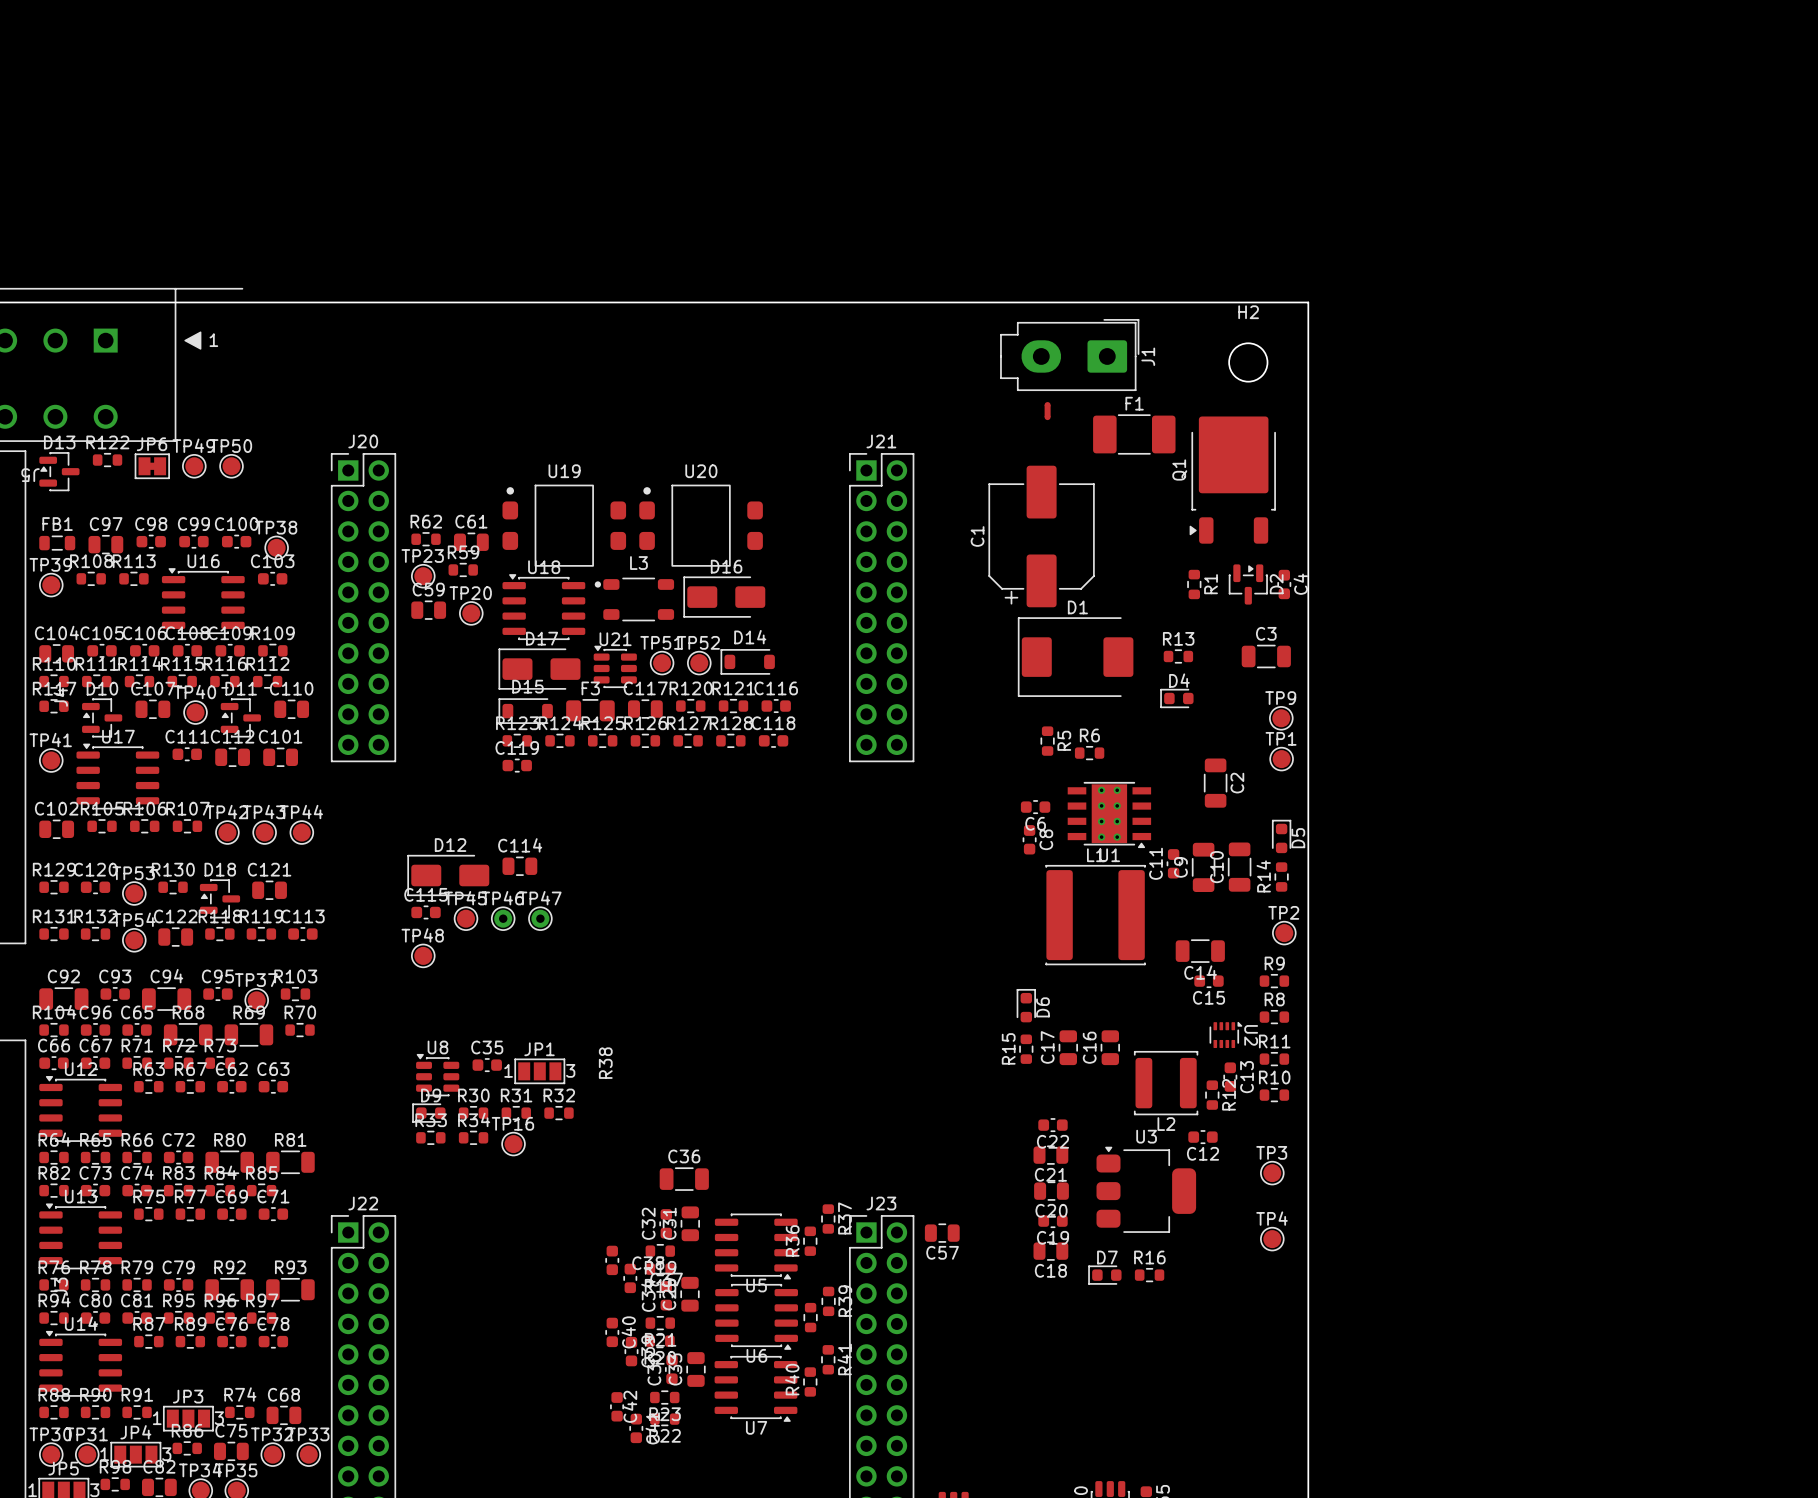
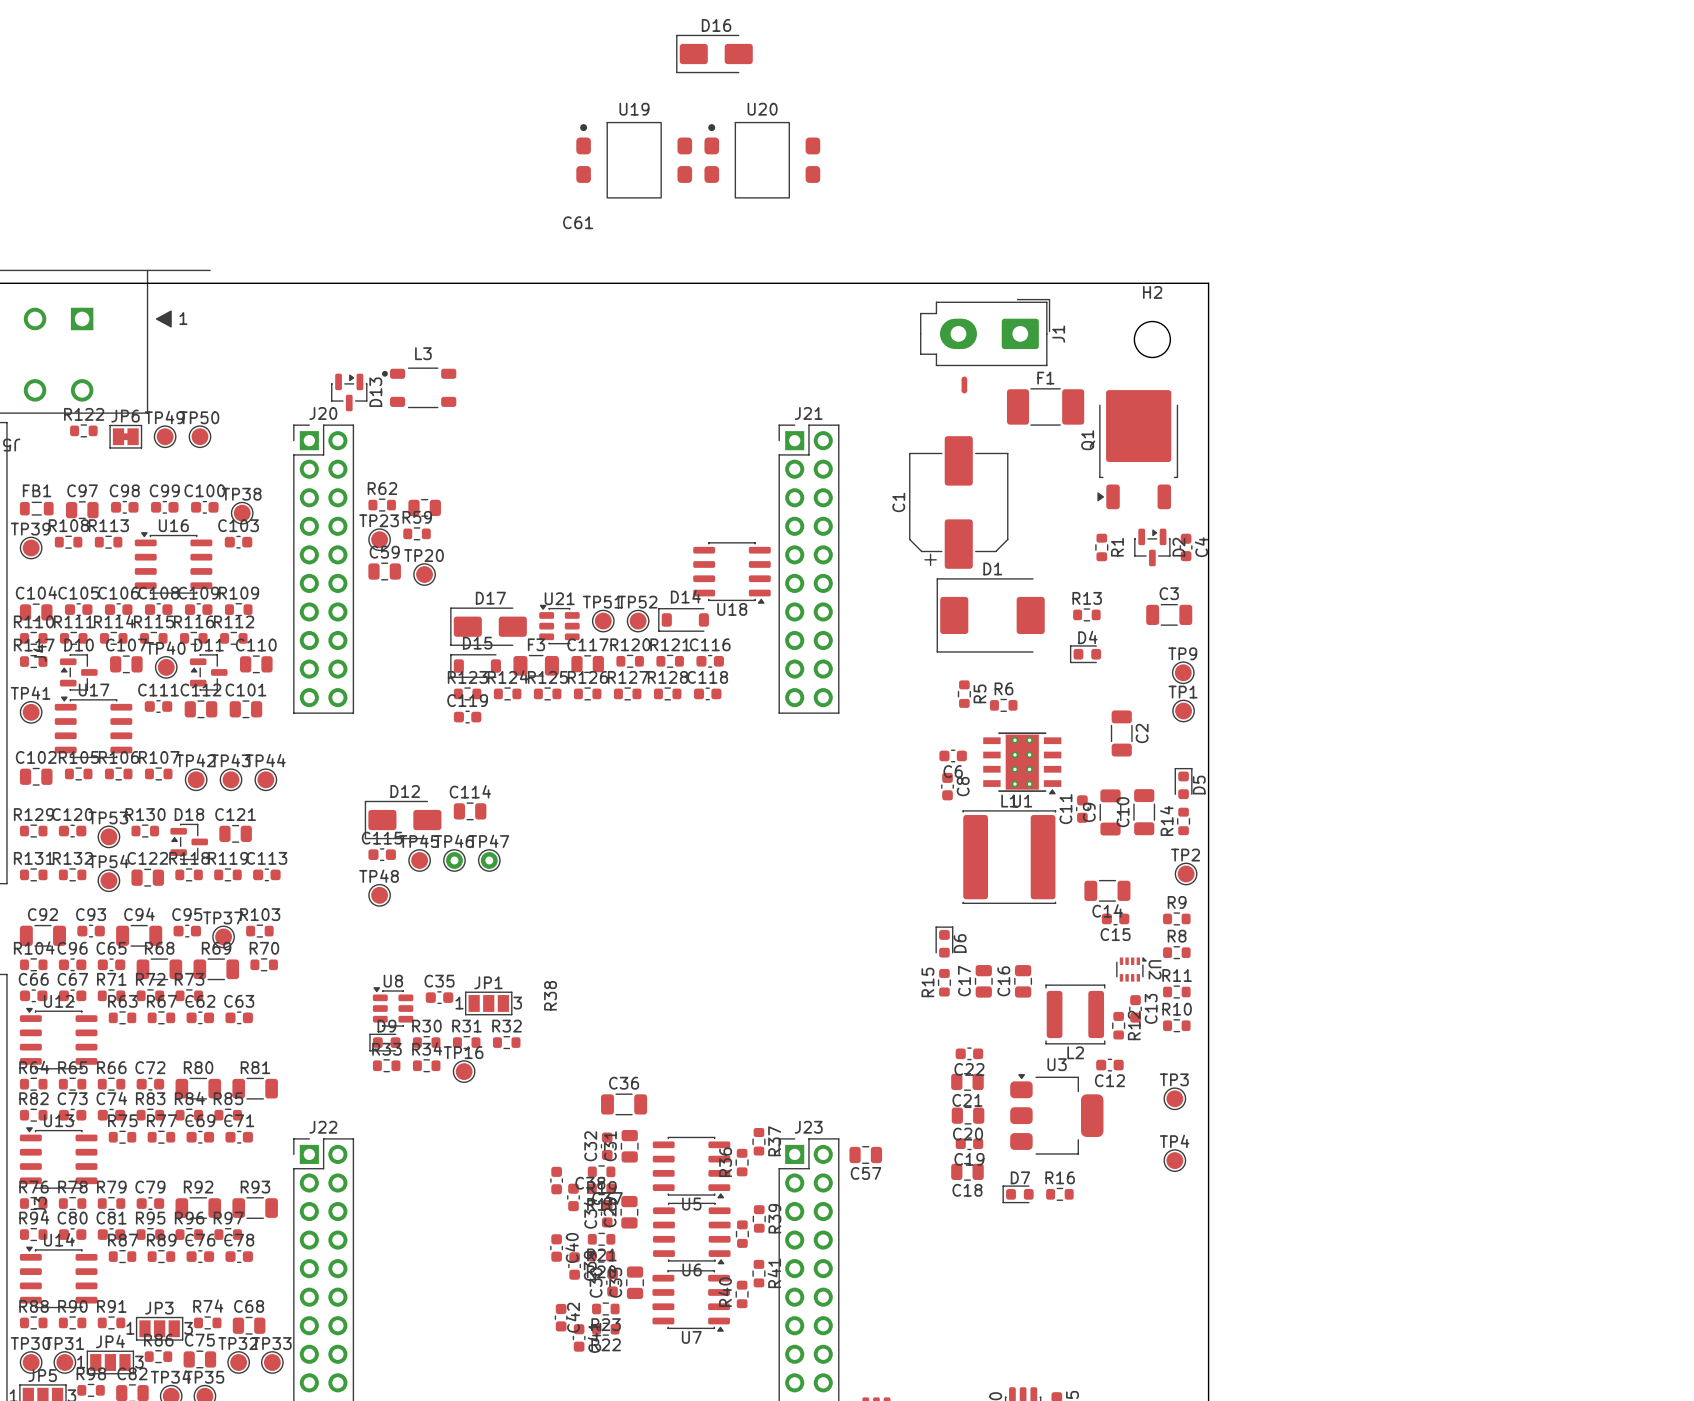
D13 rotation: 0° (59, 471) -> 90° clockwise (349, 392)
D13 position: (59, 471) -> (349, 392)
C61 name position: C61 (471, 521) -> C61 (578, 222)
U19 position: (564, 525) -> (634, 160)
U20 position: (701, 525) -> (762, 160)
D16 position: (724, 597) -> (714, 53)
L3 position: (634, 599) -> (419, 387)
U18 rotation: 0° (543, 607) -> 180° (731, 572)
U18 position: (543, 607) -> (731, 572)

